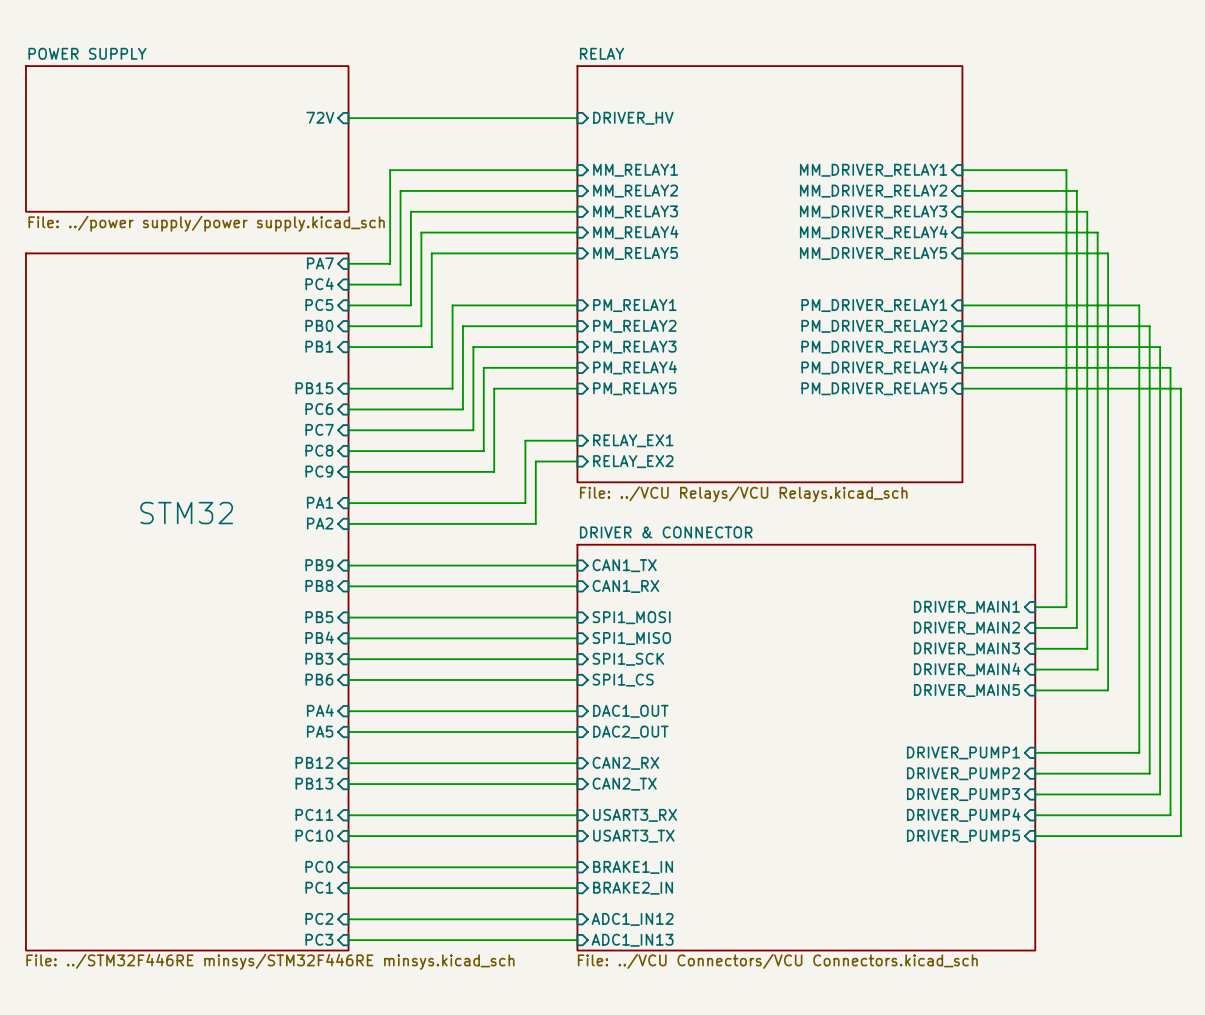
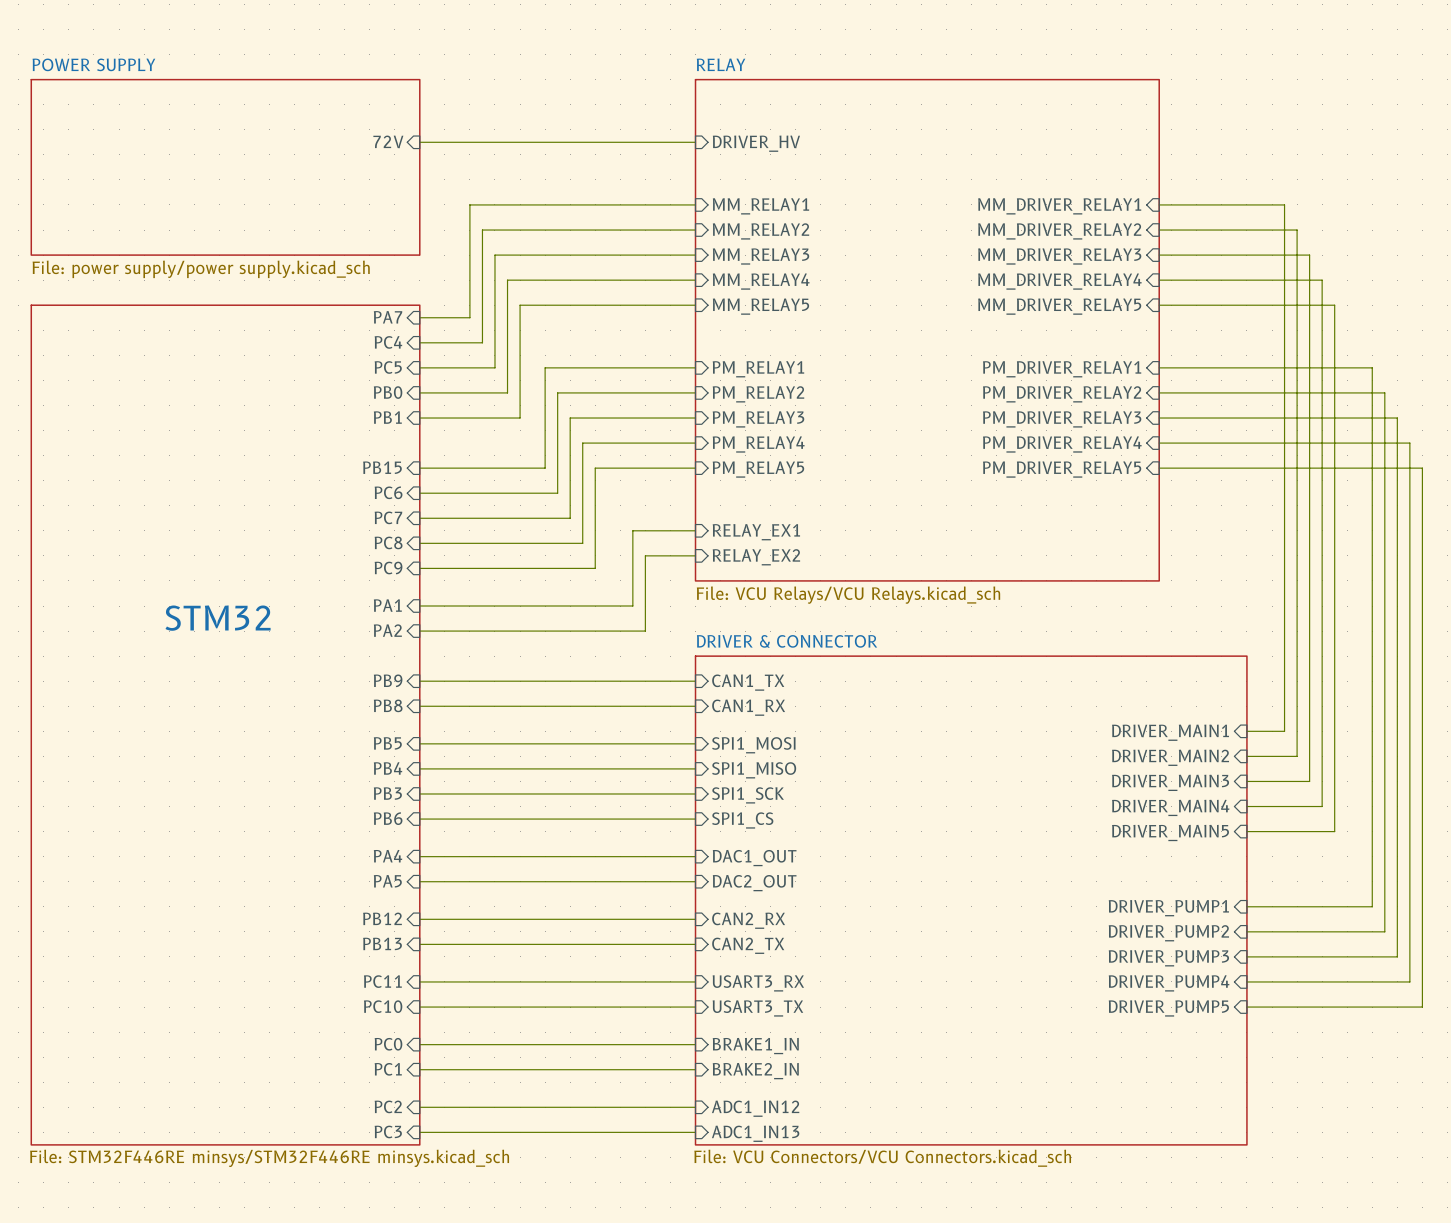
sheet POWER SUPPLY value: File: ../power supply/power supply.kicad_sch (206, 223) -> File: power supply/power supply.kicad_sch (201, 269)
sheet RELAY value: File: ../VCU Relays/VCU Relays.kicad_sch (743, 494) -> File: VCU Relays/VCU Relays.kicad_sch (848, 595)
sheet STM32 value: File: ../STM32F446RE minsys/STM32F446RE minsys.kicad_sch (270, 961) -> File: STM32F446RE minsys/STM32F446RE minsys.kicad_sch (269, 1158)
sheet DRIVER & CONNECTOR value: File: ../VCU Connectors/VCU Connectors.kicad_sch (777, 961) -> File: VCU Connectors/VCU Connectors.kicad_sch (882, 1158)

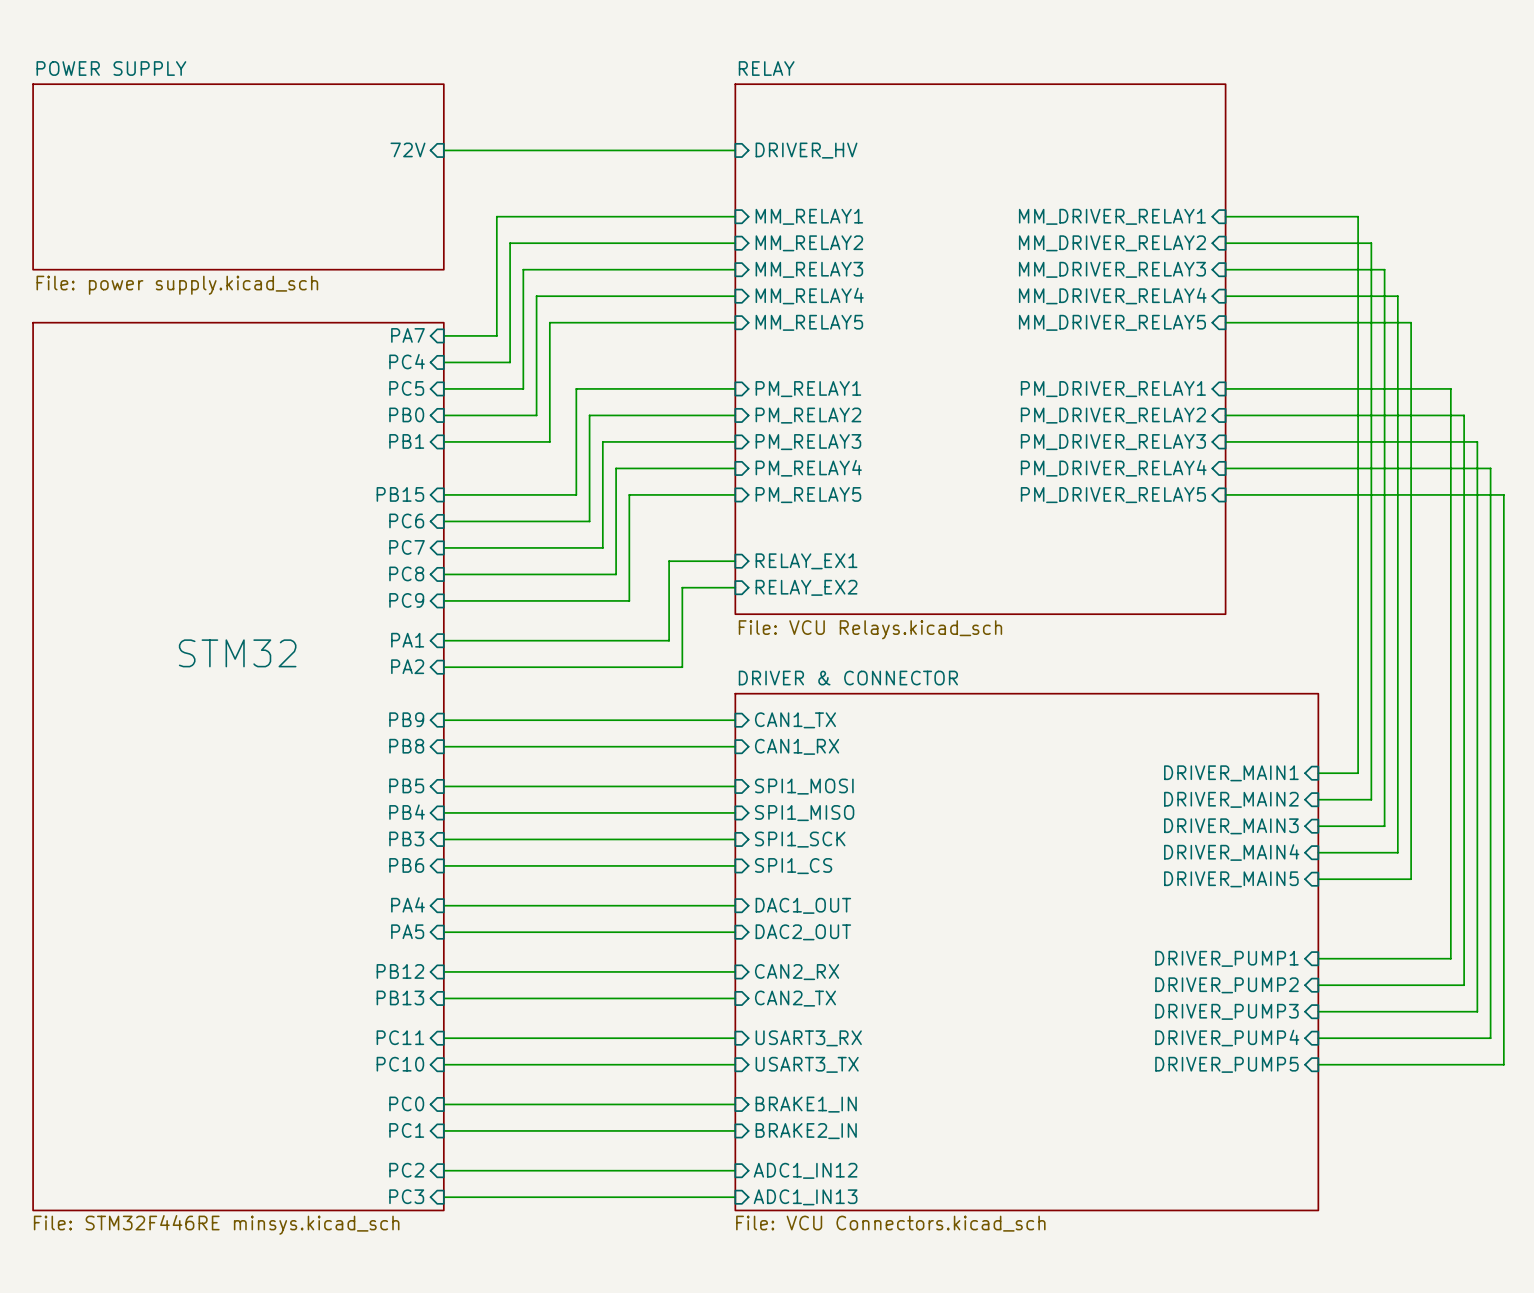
sheet POWER SUPPLY value: File: power supply/power supply.kicad_sch (201, 269) -> File: power supply.kicad_sch (177, 285)
sheet RELAY value: File: VCU Relays/VCU Relays.kicad_sch (848, 595) -> File: VCU Relays.kicad_sch (870, 629)
sheet STM32 value: File: STM32F446RE minsys/STM32F446RE minsys.kicad_sch (269, 1158) -> File: STM32F446RE minsys.kicad_sch (216, 1224)
sheet DRIVER & CONNECTOR value: File: VCU Connectors/VCU Connectors.kicad_sch (882, 1158) -> File: VCU Connectors.kicad_sch (890, 1223)

